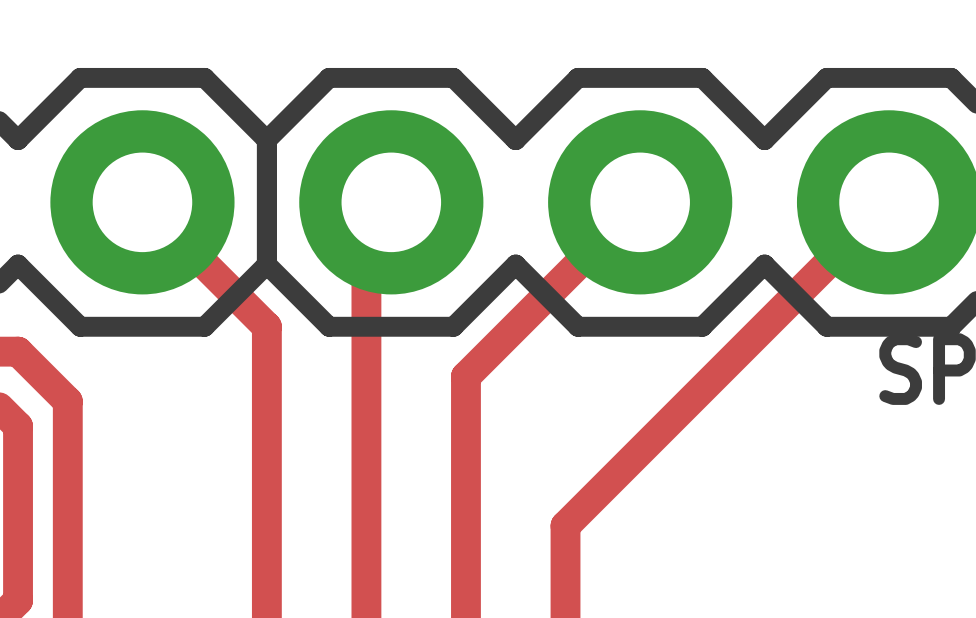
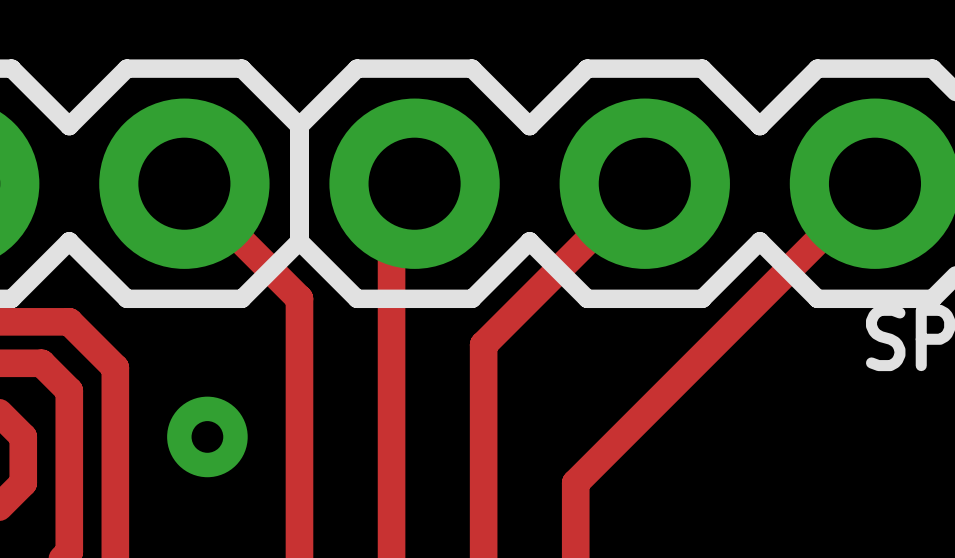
via: none -> (207, 436)

